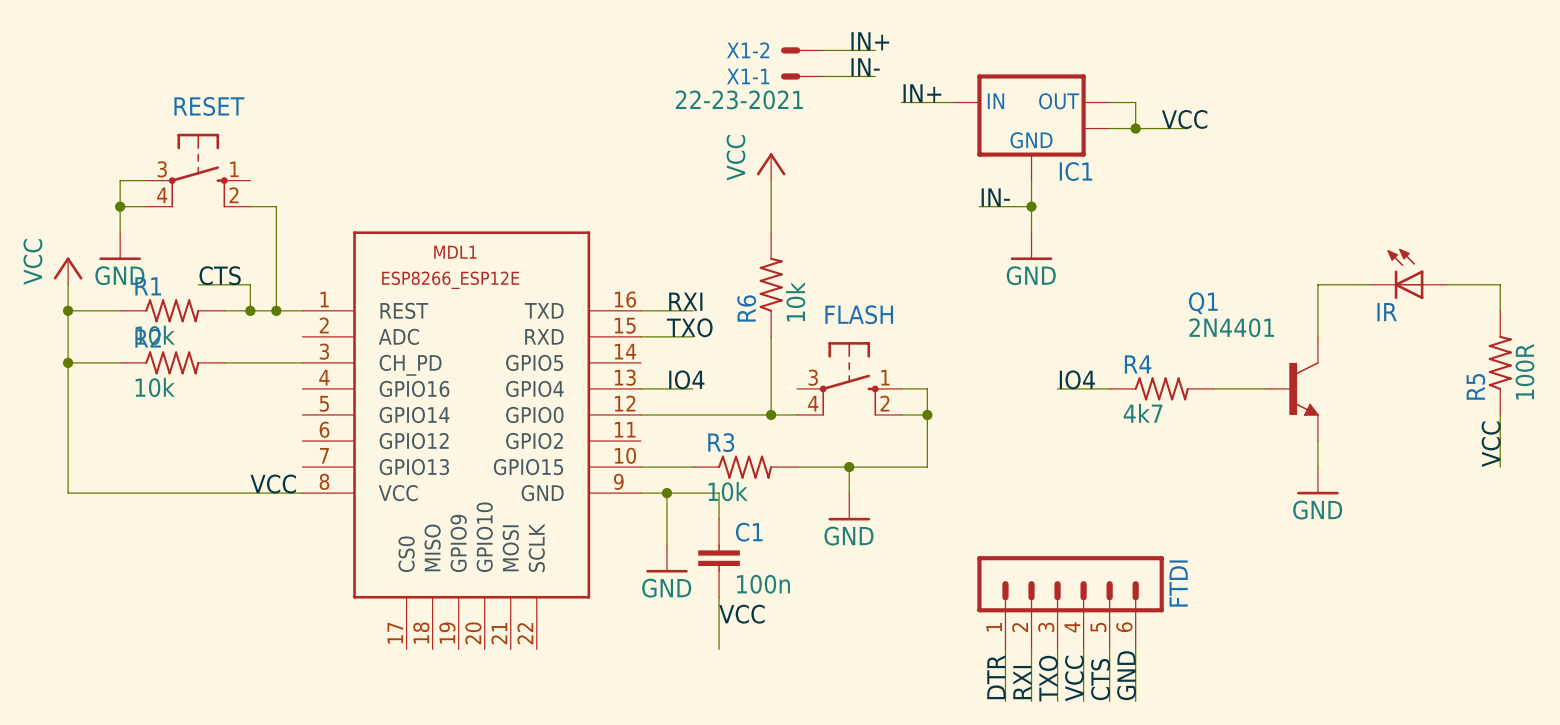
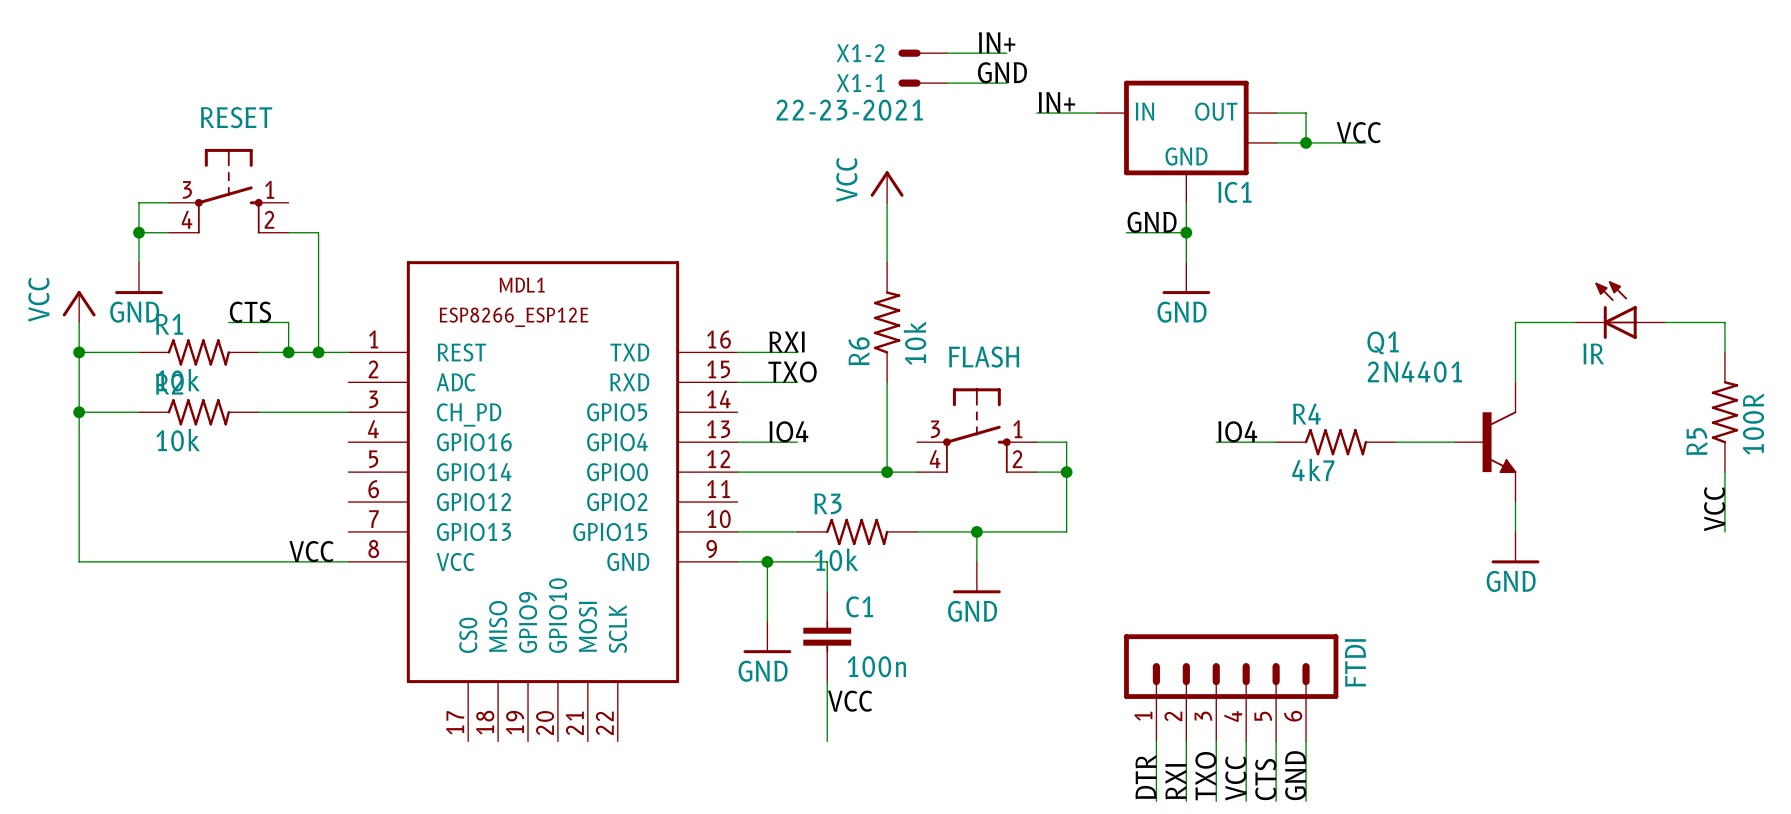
label: IN- (865, 67) -> GND (1002, 72)
label: IN- (995, 197) -> GND (1152, 222)

